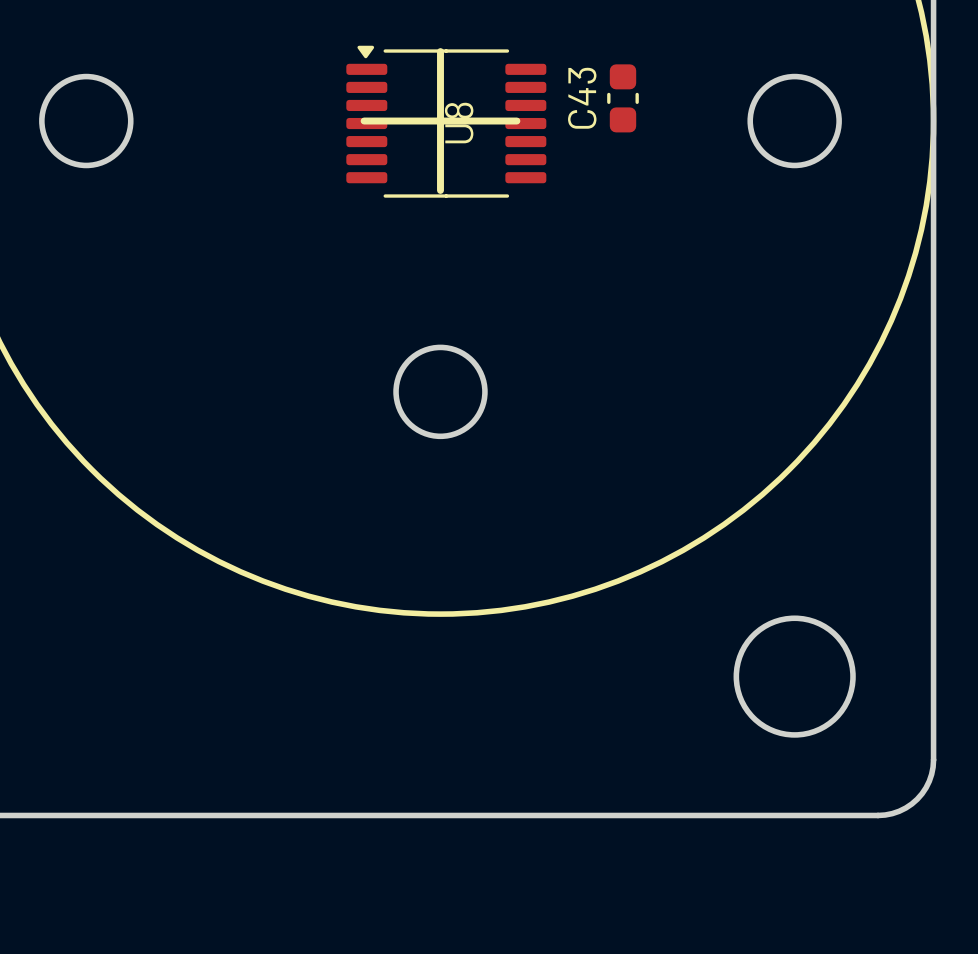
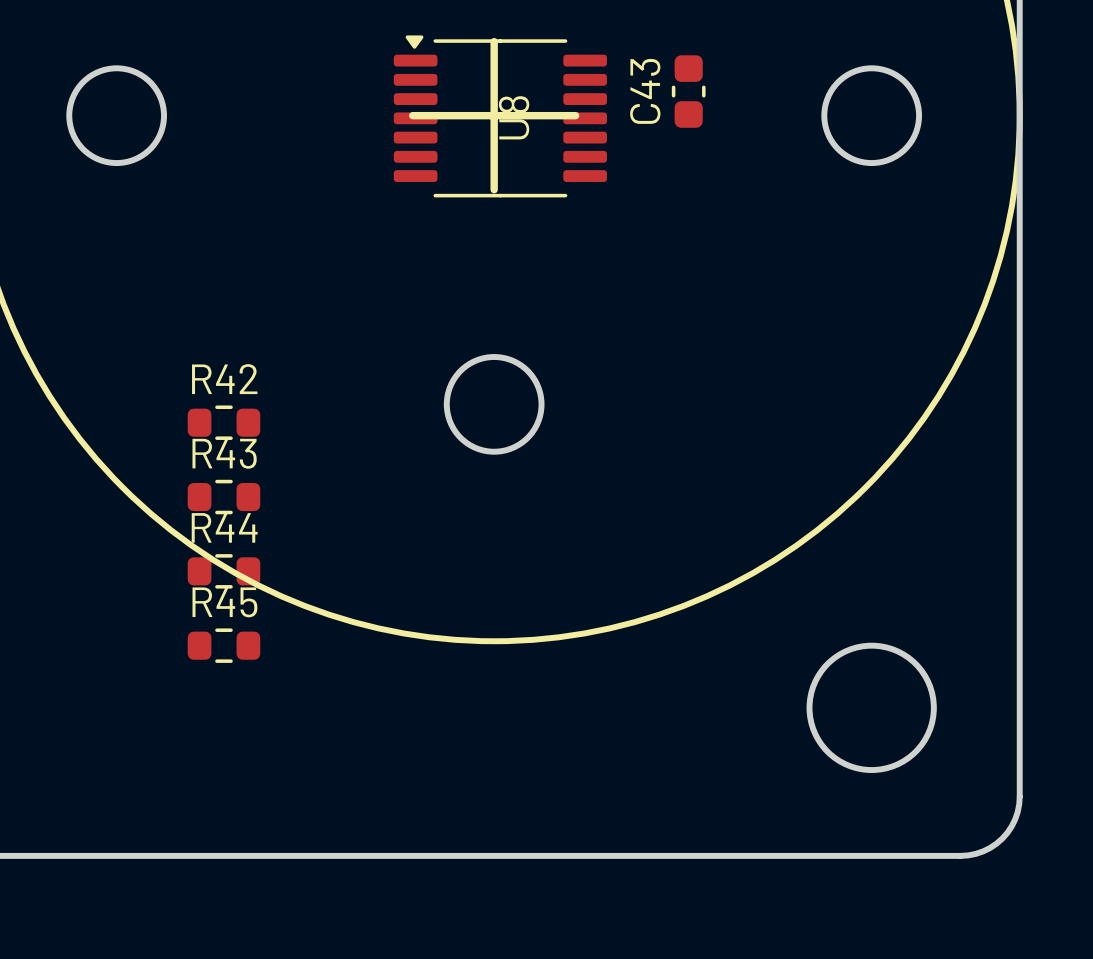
R42: none -> (223, 422)
R43: none -> (223, 497)
R44: none -> (223, 571)
R45: none -> (223, 645)

